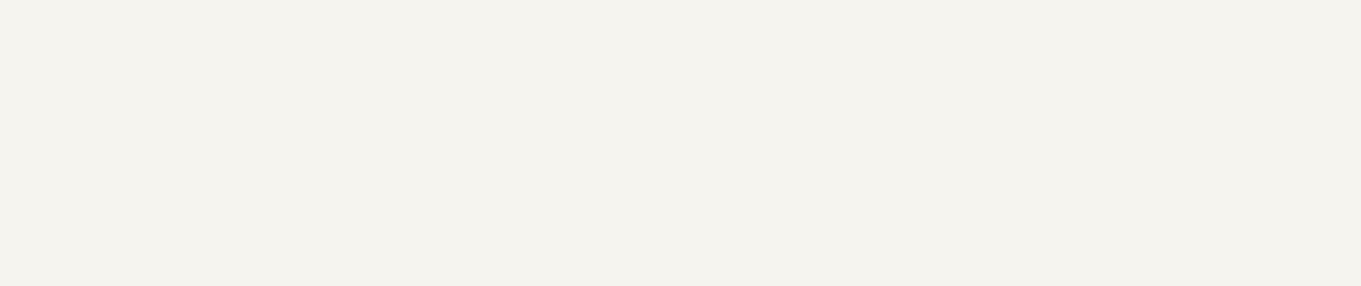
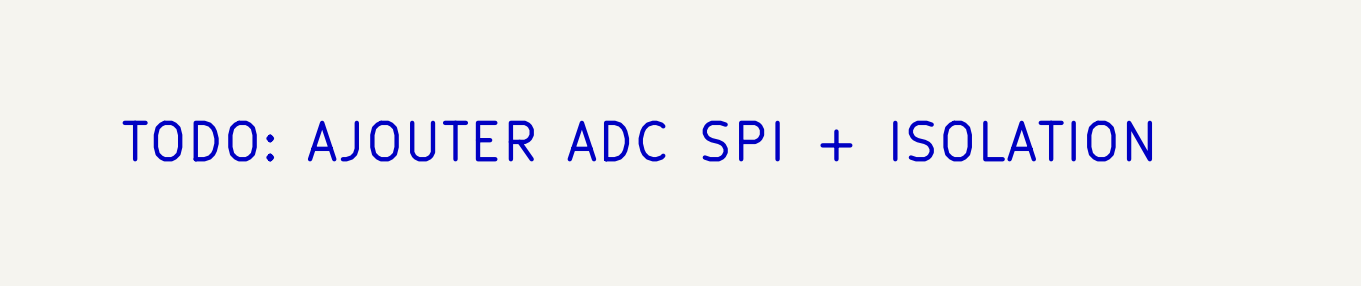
text: none -> TODO: AJOUTER ADC SPI + ISOLATION (637, 141)

